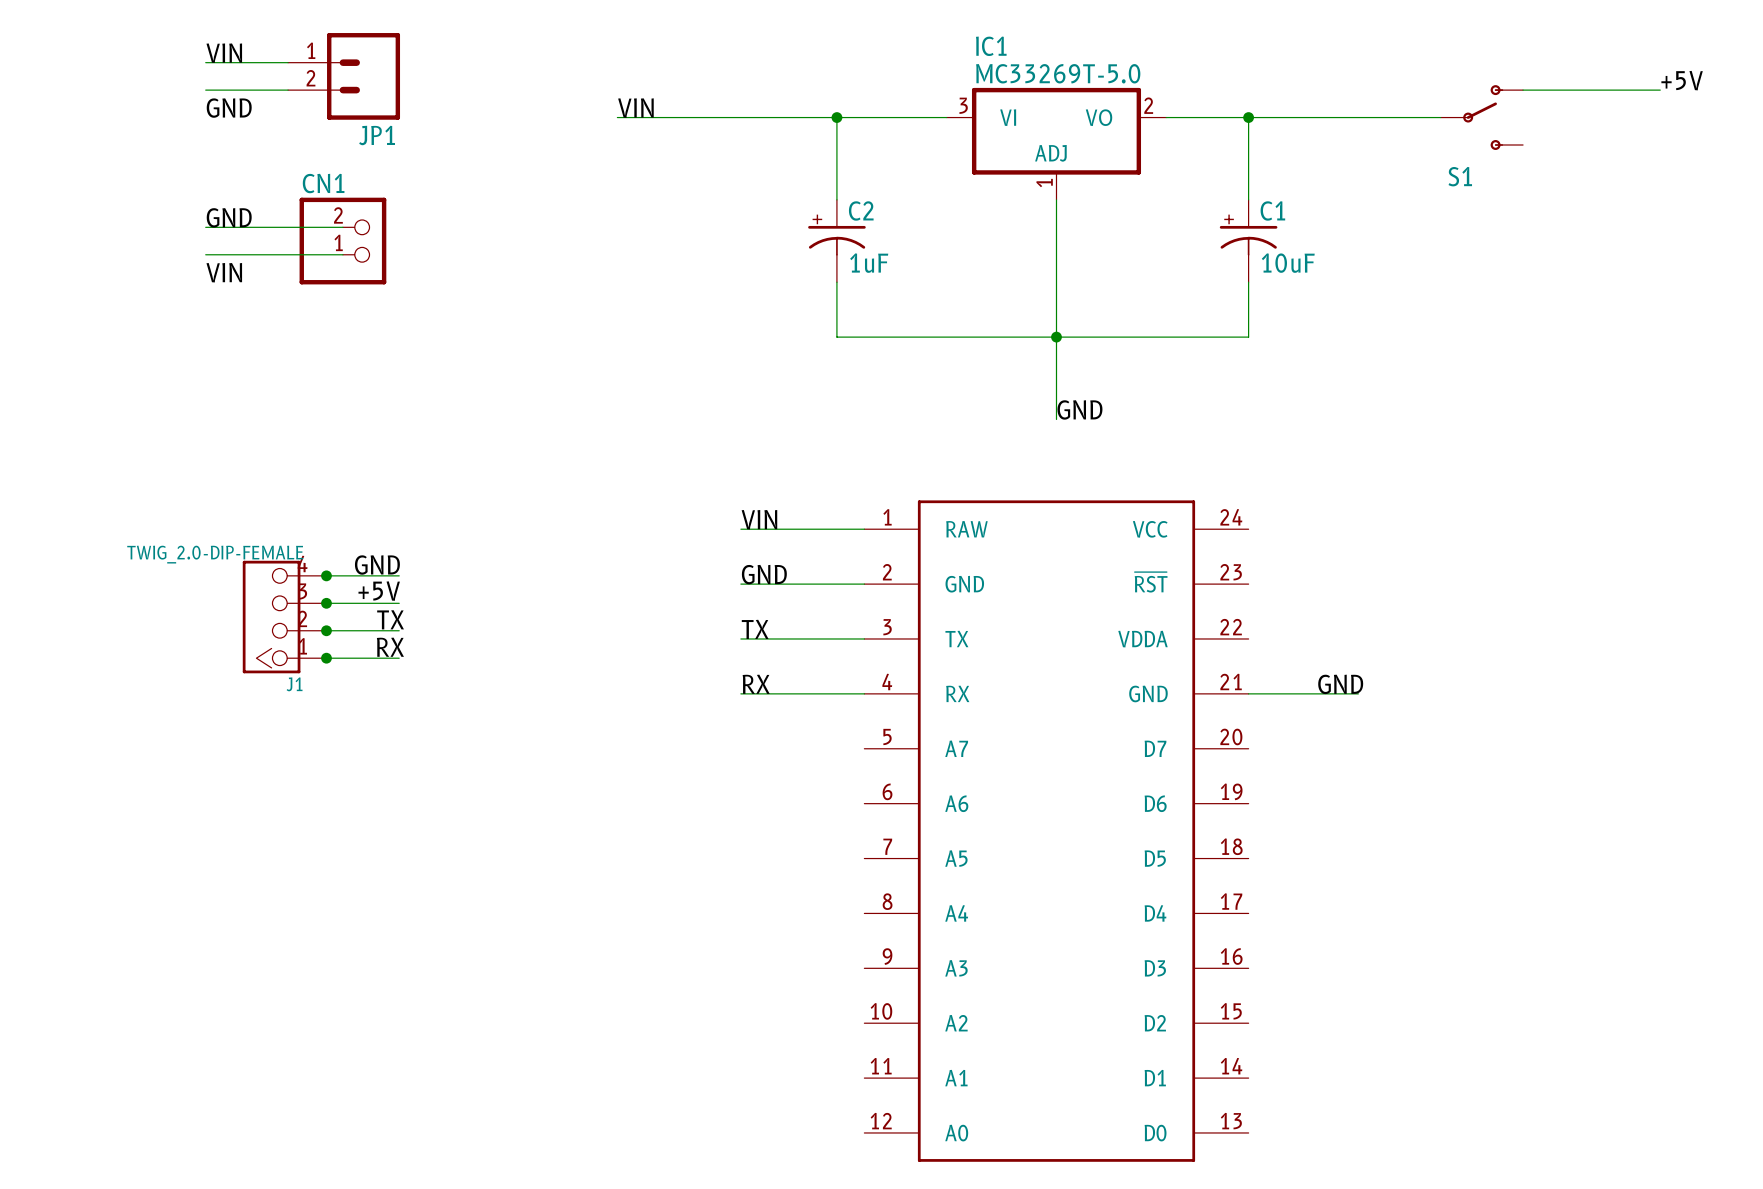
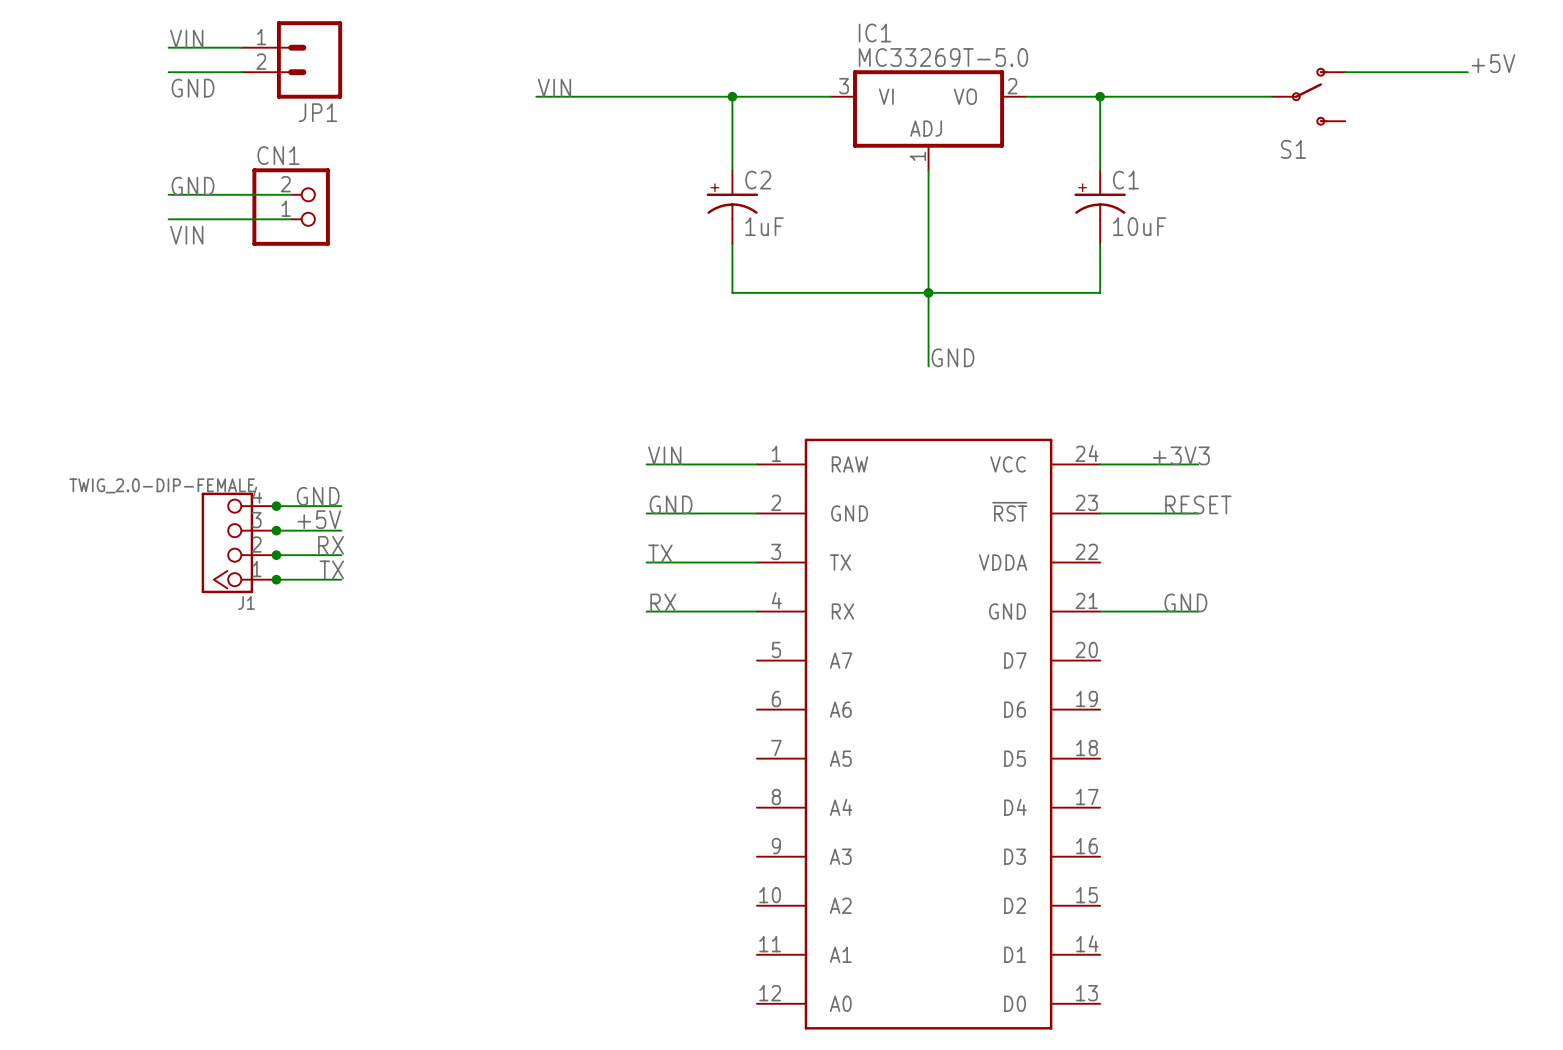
label: none -> +3V3 (1181, 455)
wire: none -> (1100, 464) (1198, 464)
label: none -> RESET (1198, 504)
wire: none -> (1100, 513) (1198, 513)
label: TX (390, 619) -> RX (331, 545)
label: RX (390, 647) -> TX (331, 569)

